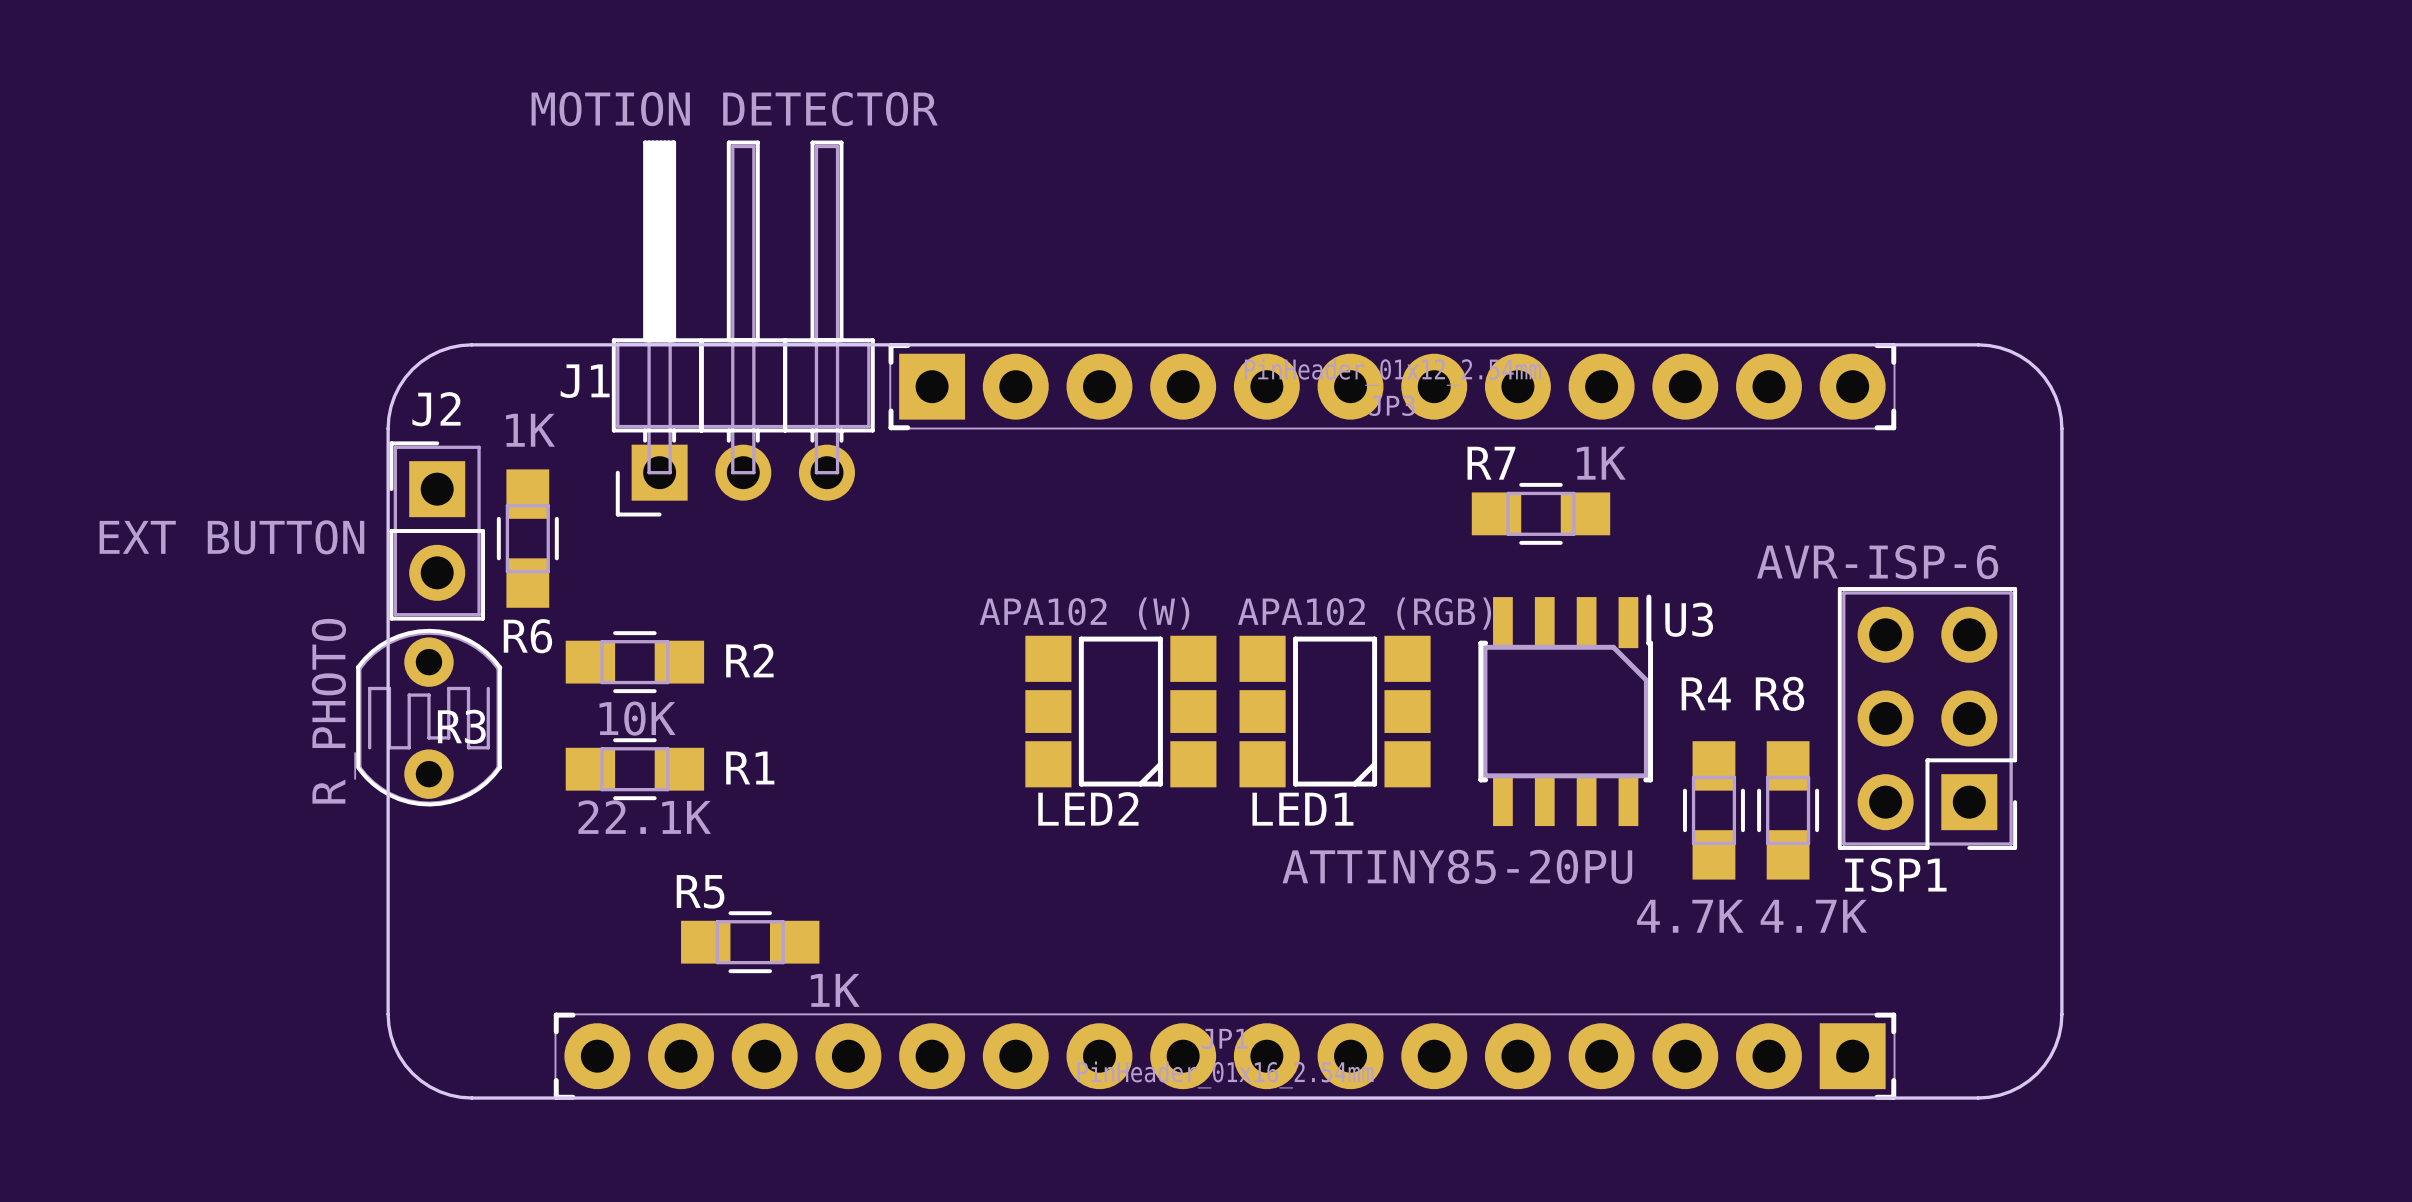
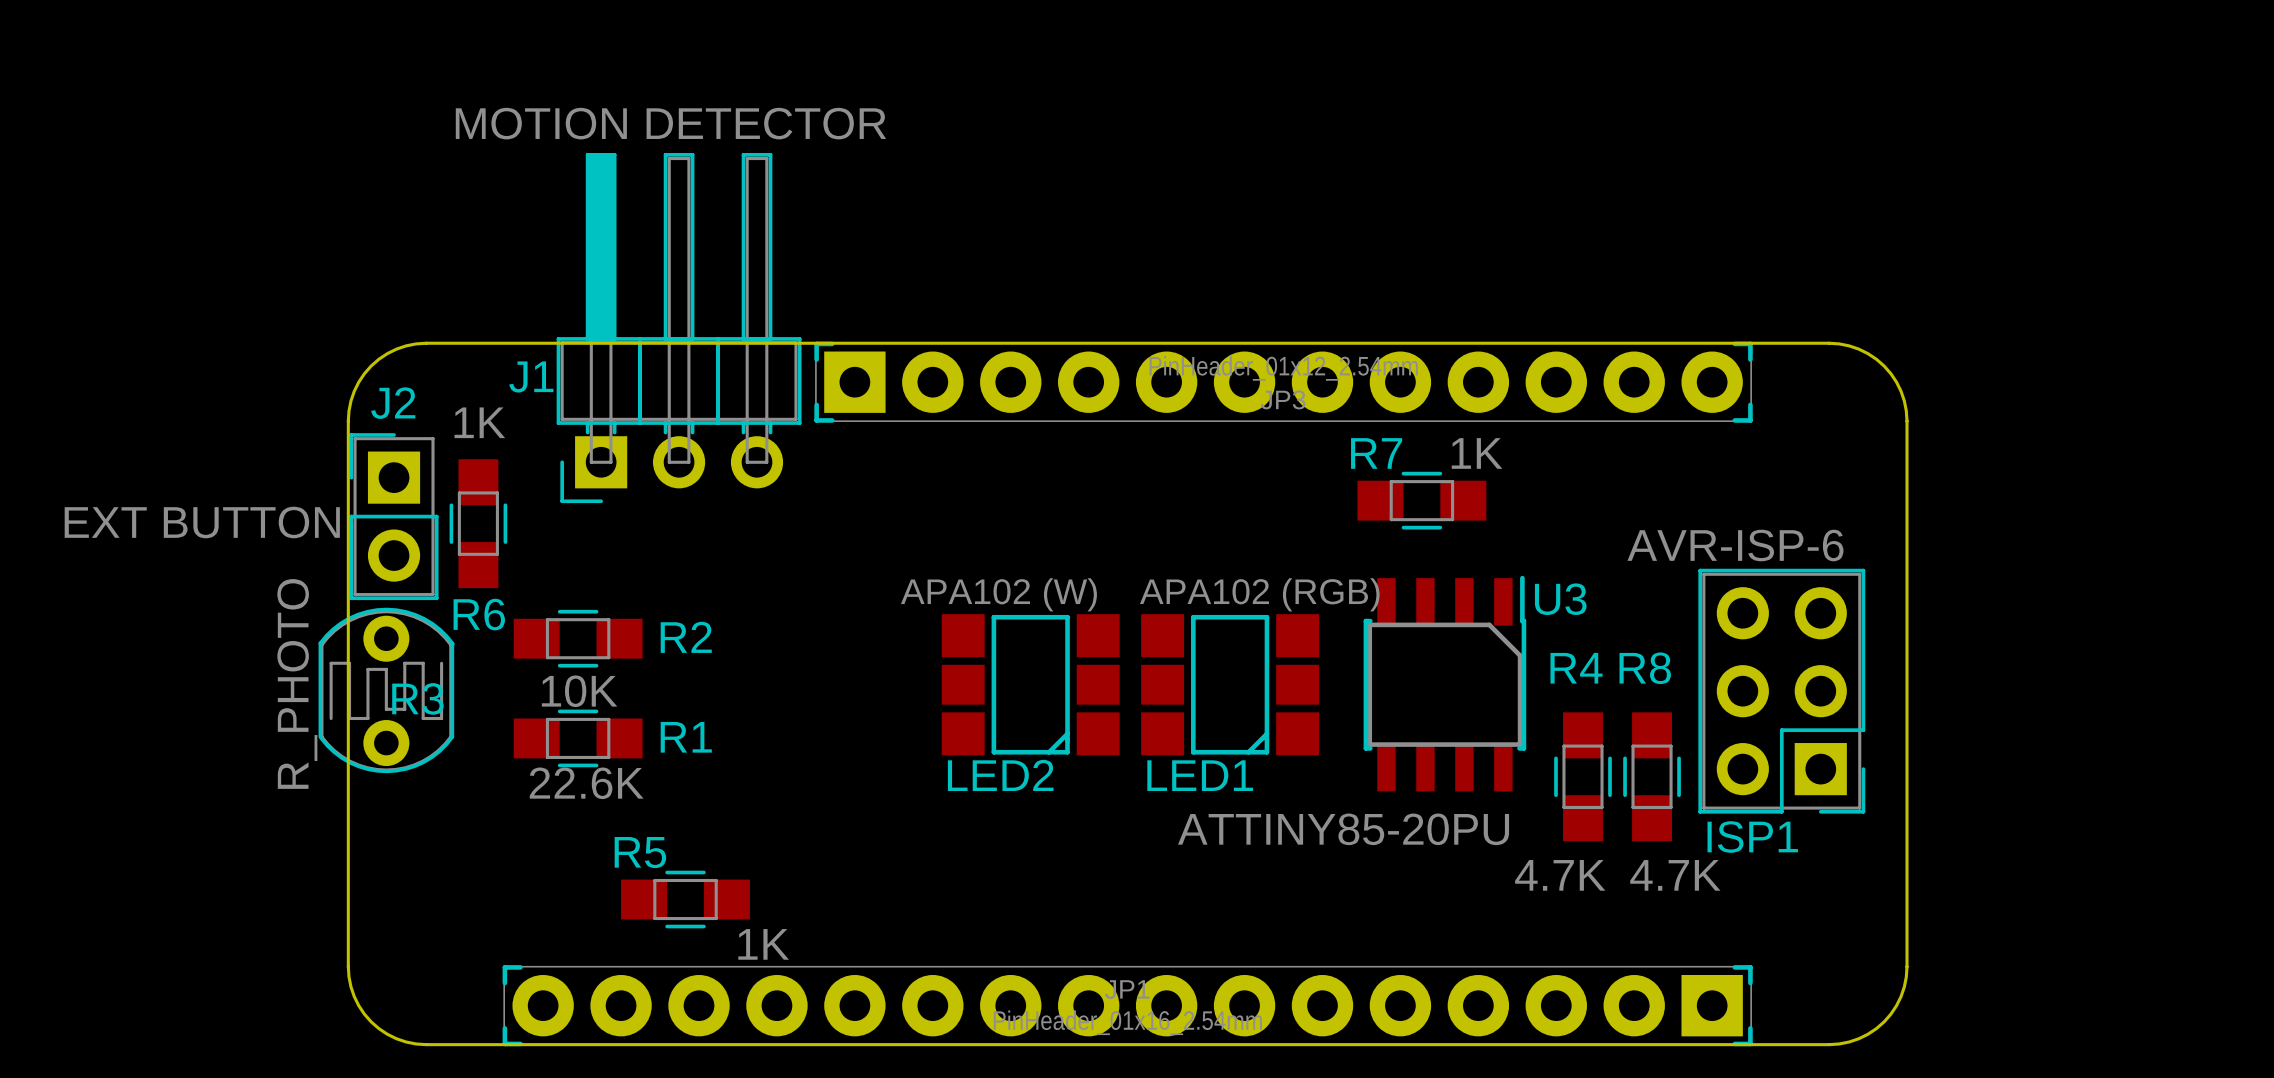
R1 value: 22.1K (644, 817) -> 22.6K (586, 783)

